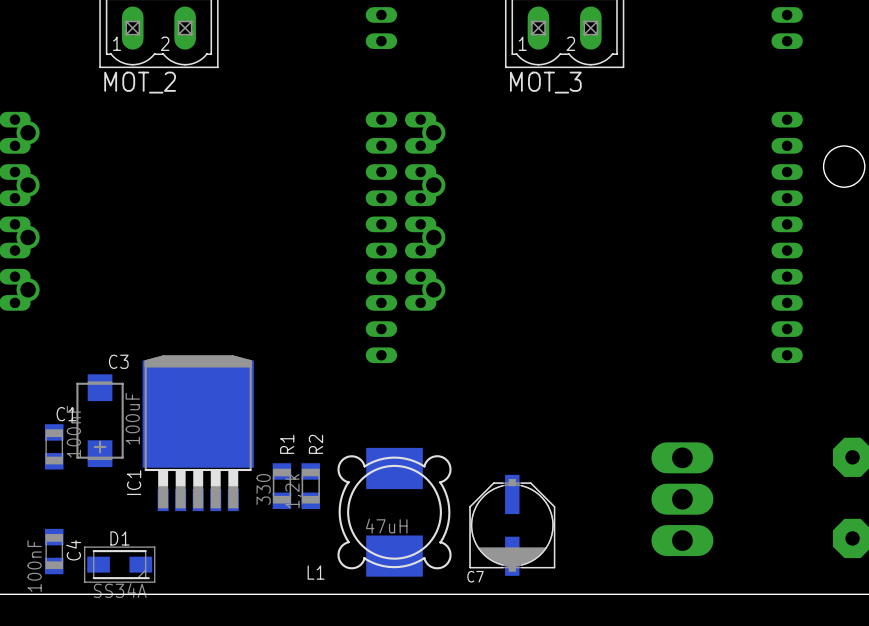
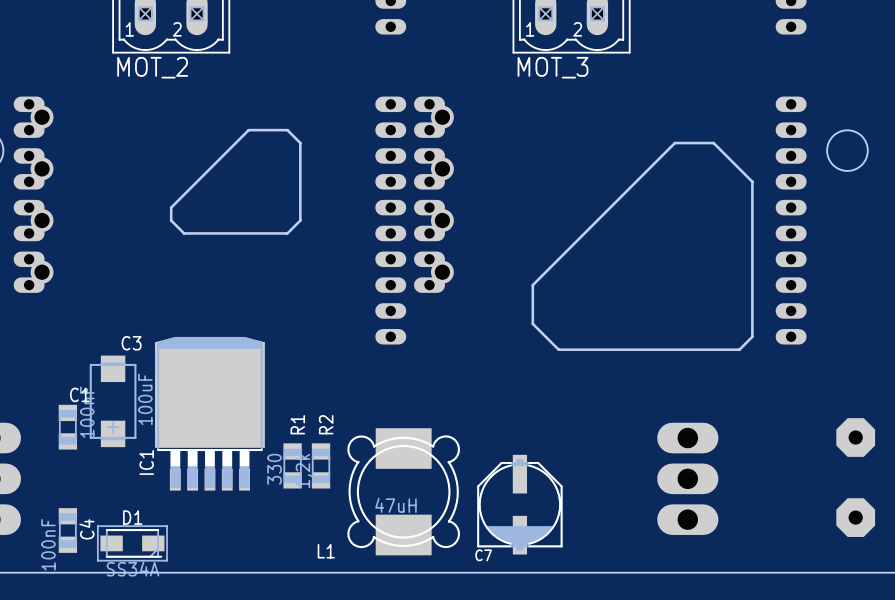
board edge: none -> (287, 130) (300, 143) (300, 220) (287, 233) (184, 233) (171, 220) (171, 207) (248, 130) (287, 130)
board edge: none -> (713, 143) (674, 143) (532, 285) (532, 323) (558, 349) (739, 349) (752, 336) (752, 181) (713, 143)

